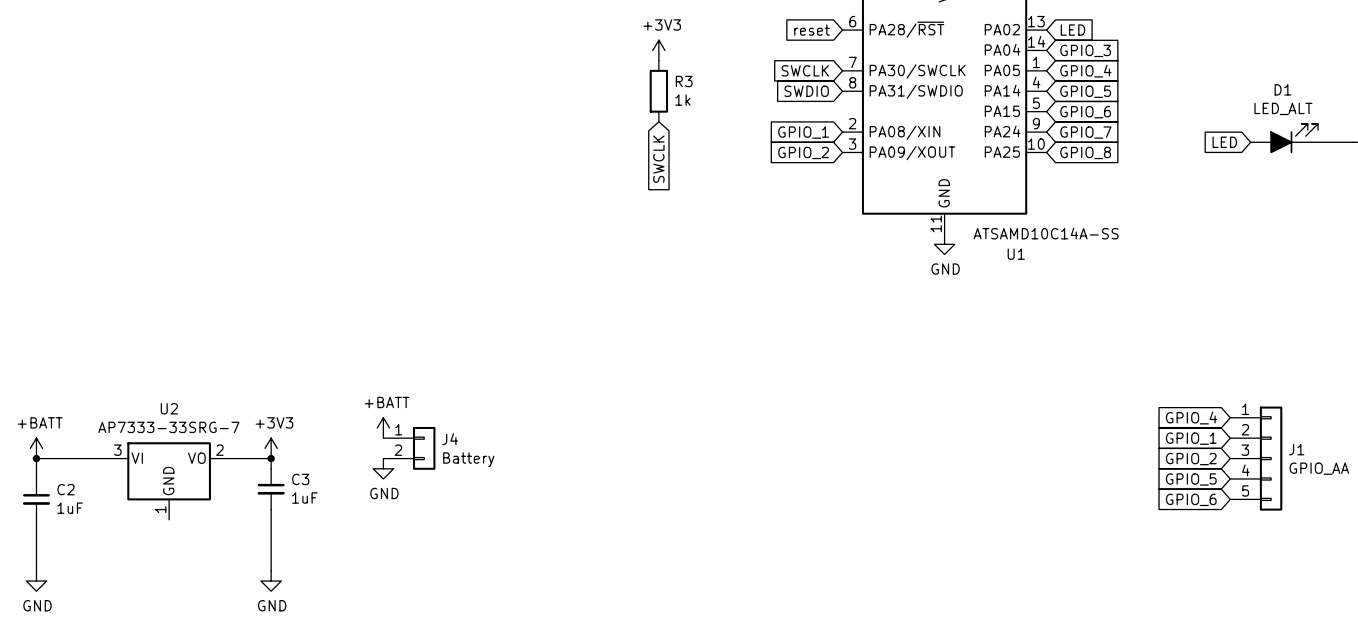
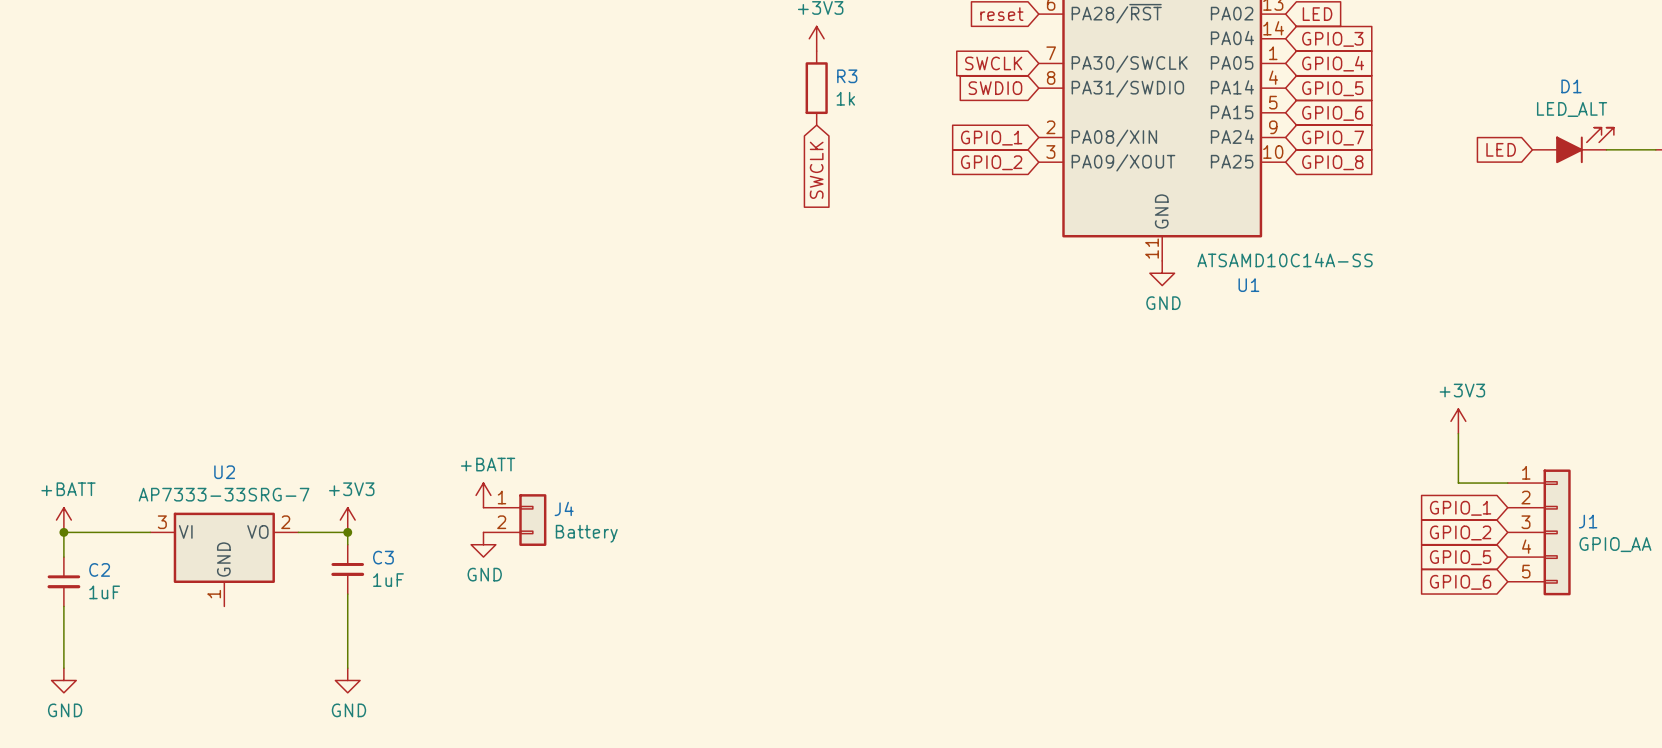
power symbol: none -> +3V3 (1458, 421)
wire: none -> (1458, 433) (1458, 483) (1507, 483)
global label: GPIO_4 (1191, 418) -> none

